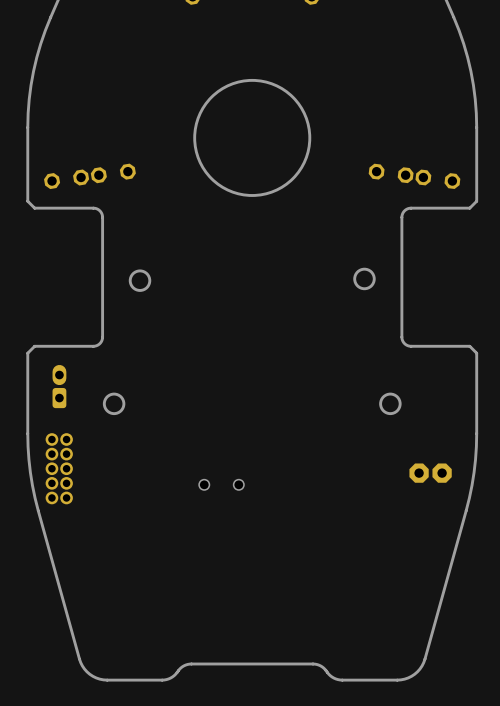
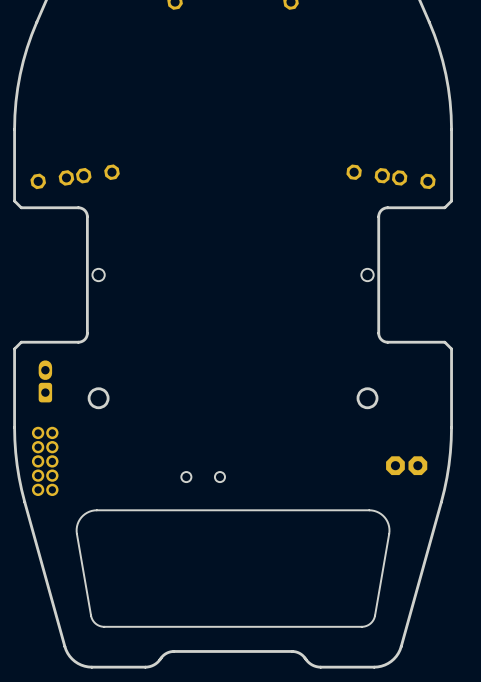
round board edge: [193, 78, 312, 197] -> none
round board edge: [353, 267, 376, 291] -> none
round board edge: [128, 269, 152, 292] -> none
round board edge: none -> [92, 268, 105, 282]
round board edge: none -> [361, 268, 374, 282]
board edge: none -> (369, 510) (89, 511) (79, 519) (76, 531) (91, 618) (96, 624) (104, 626) (366, 626) (374, 617) (389, 531) (384, 517) (378, 512) (369, 510)

